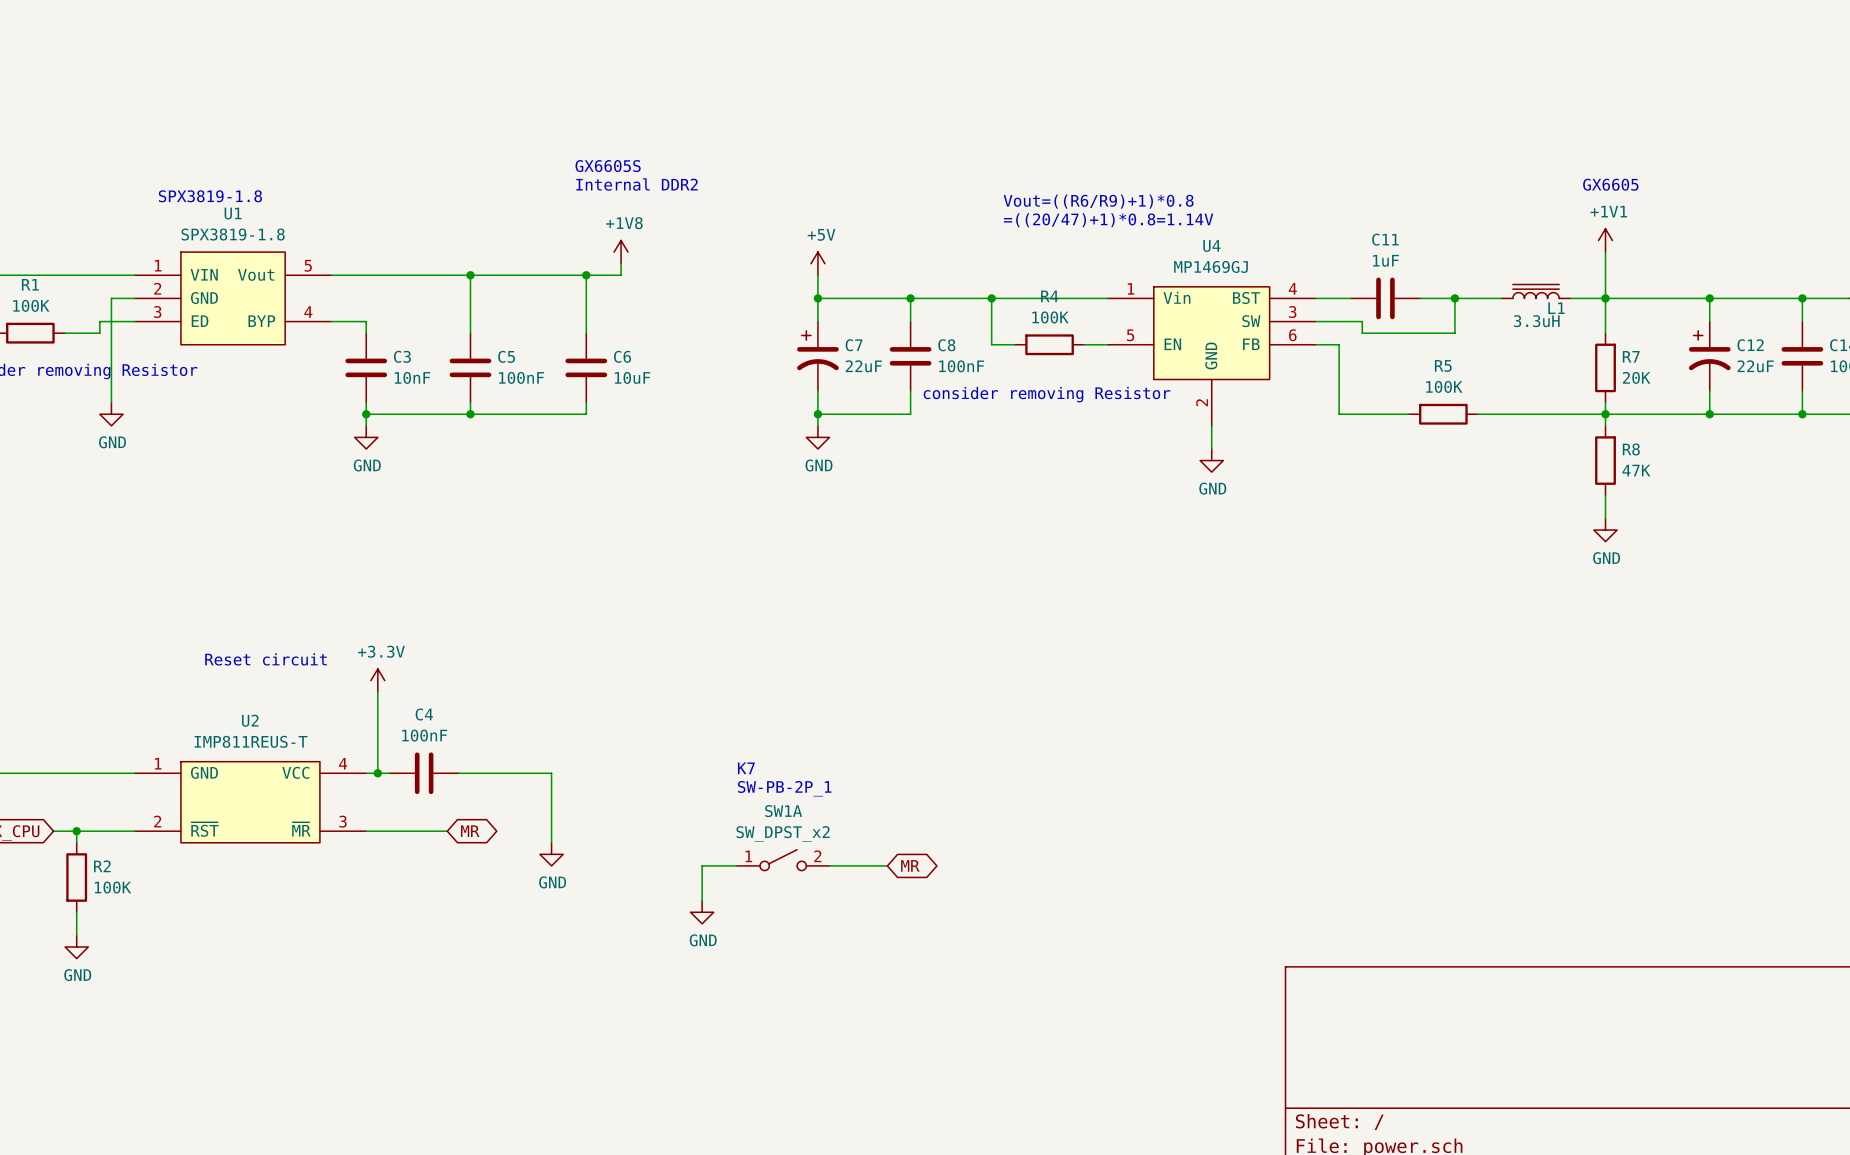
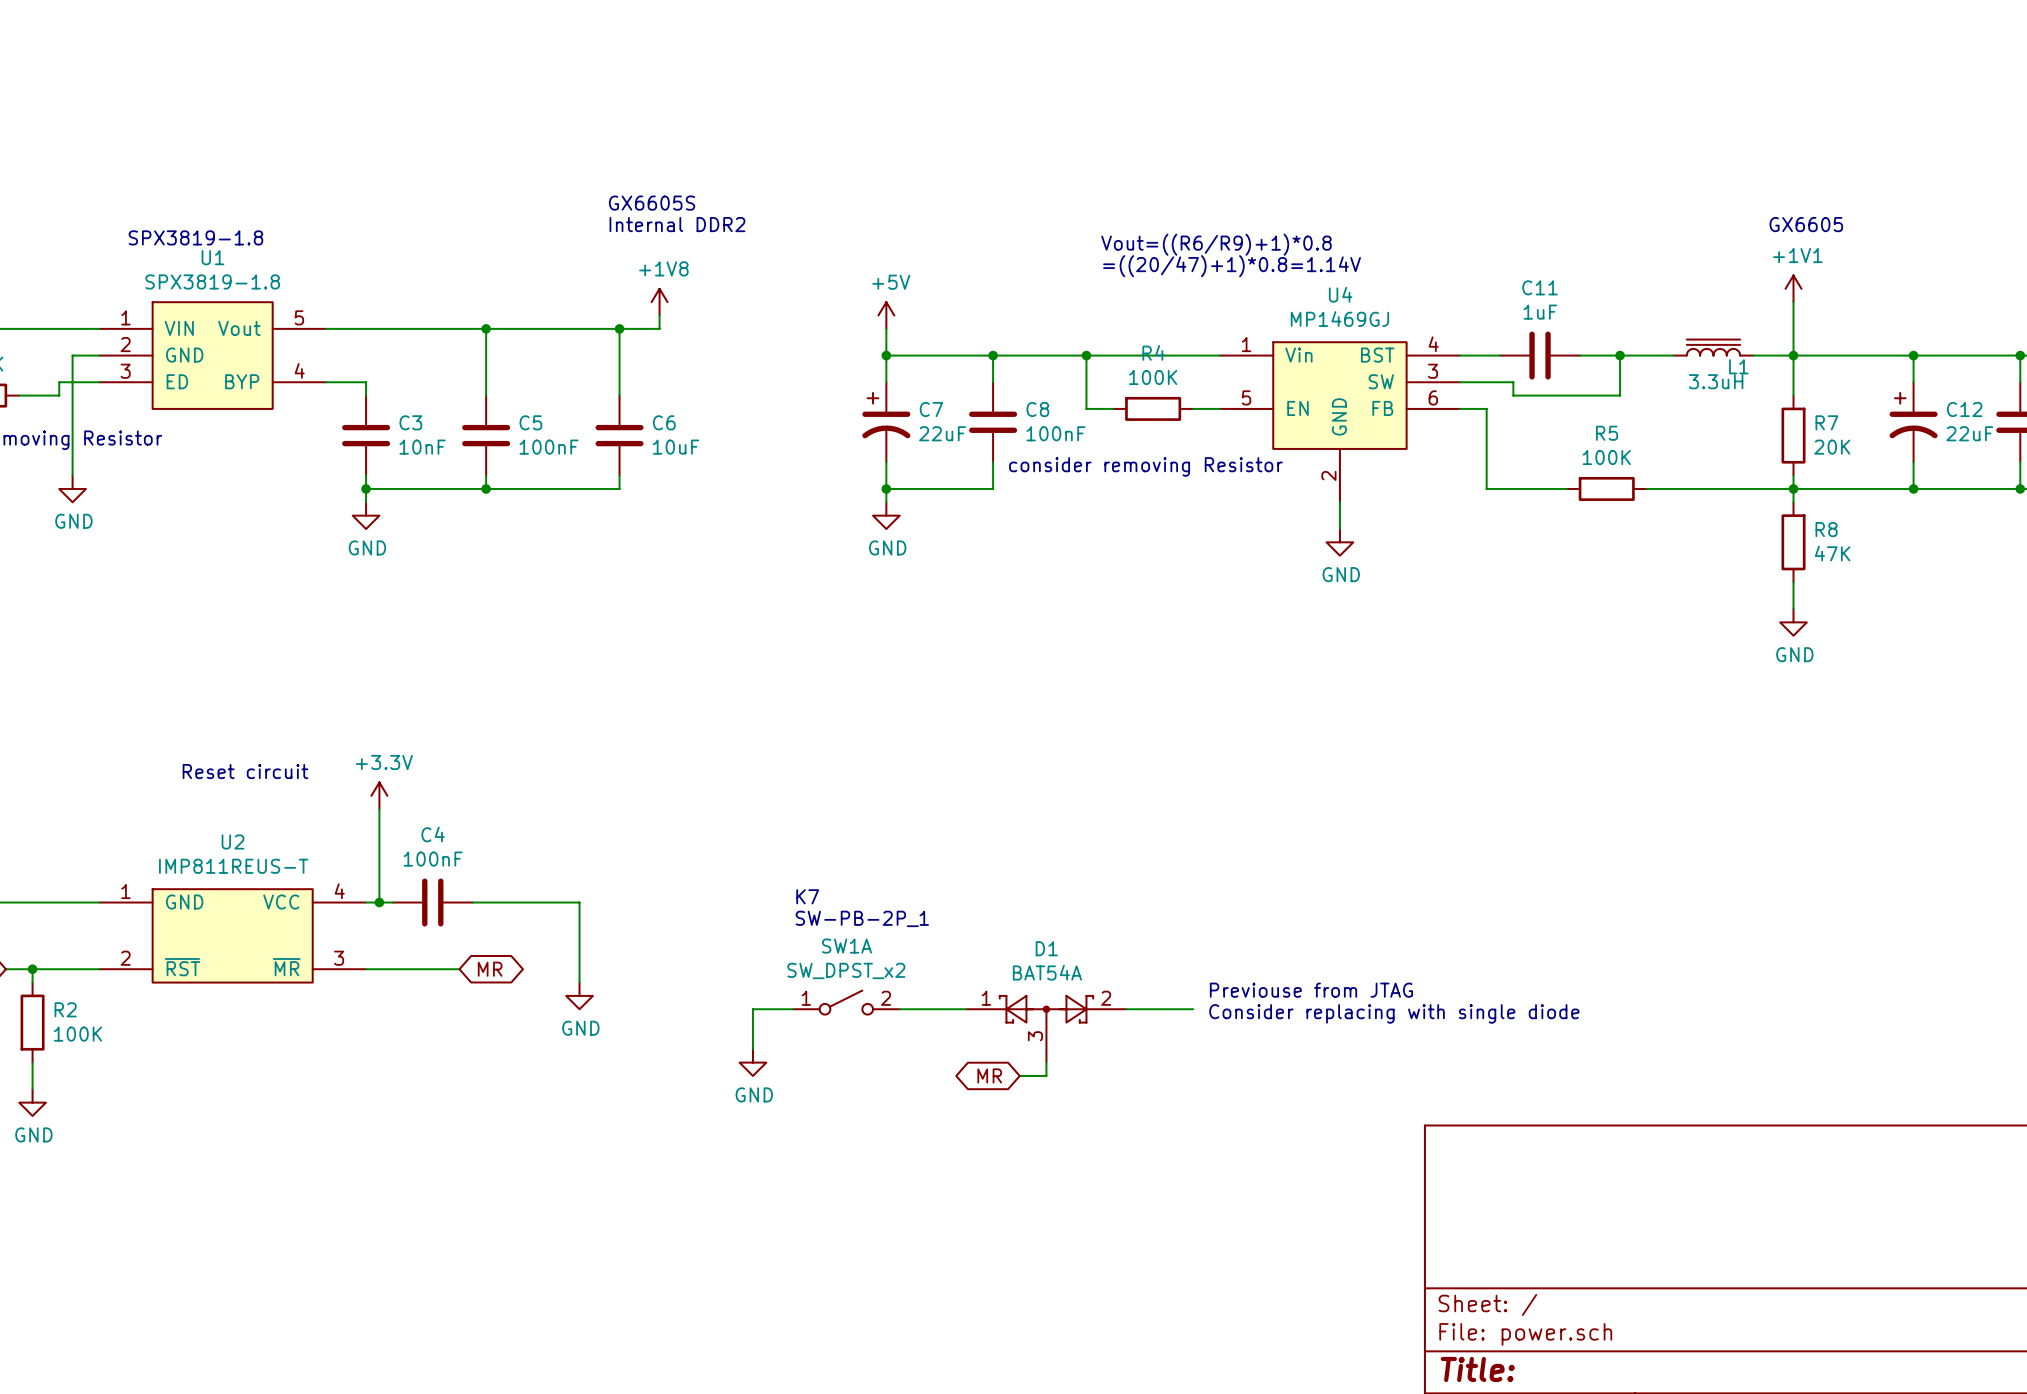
text: none -> Previouse from JTAG (1311, 990)
global label rotation: 0° (910, 865) -> 180° (989, 1075)
global label position: MR (910, 865) -> MR (989, 1075)
wire: none -> (1126, 1009) (1193, 1009)
text: none -> Consider replacing with single diode (1394, 1013)
D1: none -> BAT54A (1046, 1029)
wire: none -> (1046, 1062) (1046, 1075) (1019, 1075)

